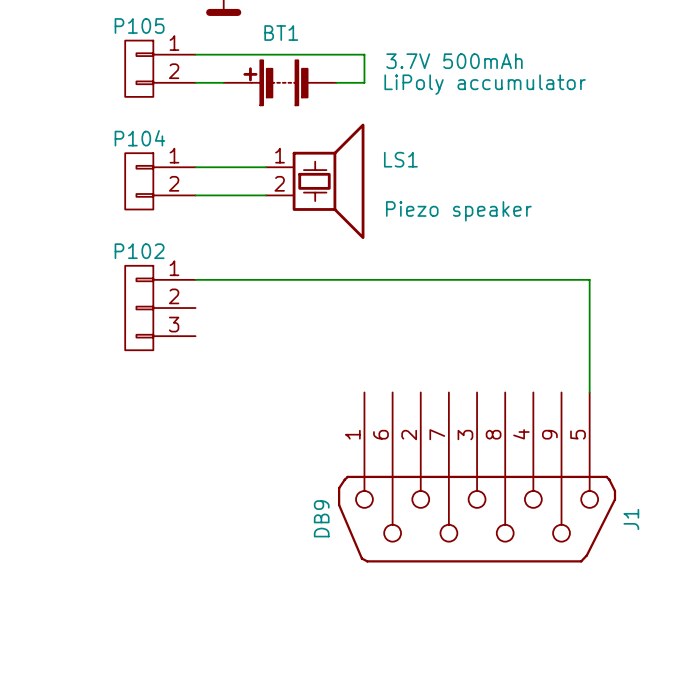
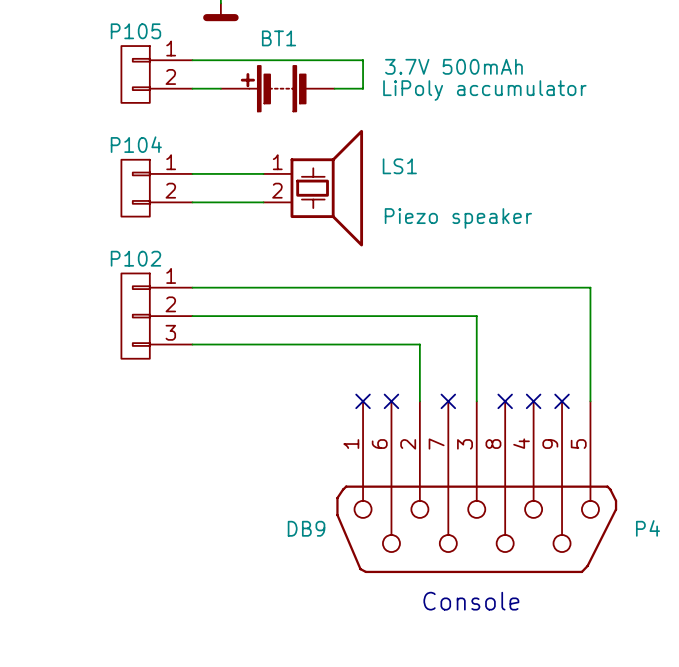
wire: none -> (192, 316) (476, 316) (476, 401)
wire: none -> (192, 344) (419, 344) (419, 401)
no-connect mark: none -> (363, 401)
no-connect mark: none -> (391, 401)
no-connect mark: none -> (448, 401)
no-connect mark: none -> (505, 401)
no-connect mark: none -> (533, 401)
no-connect mark: none -> (562, 401)
J1 value rotation: 0° (321, 518) -> 90° clockwise (306, 528)
J1 name: J1 (631, 519) -> P4 (647, 528)
text: none -> Console (471, 601)

